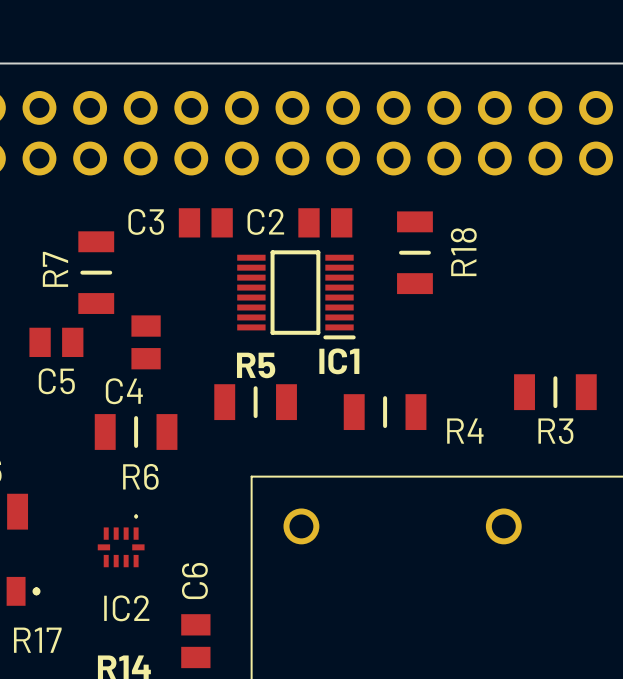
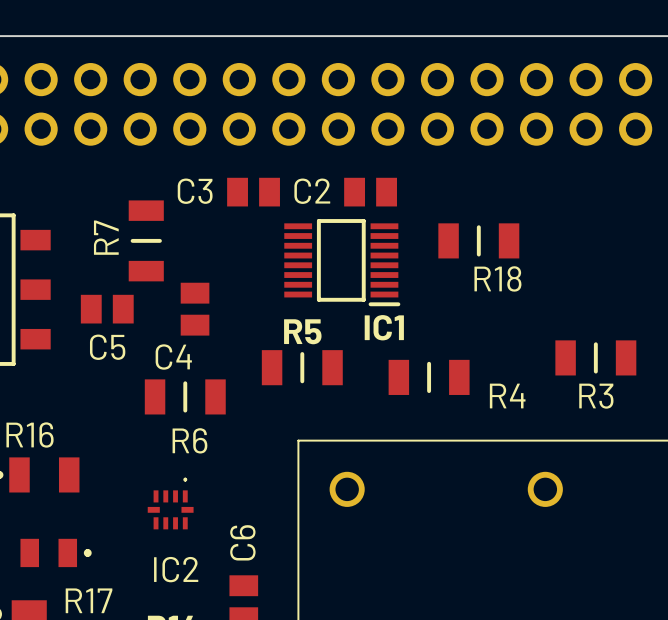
R18 rotation: 0° (414, 252) -> 90° clockwise (478, 240)

